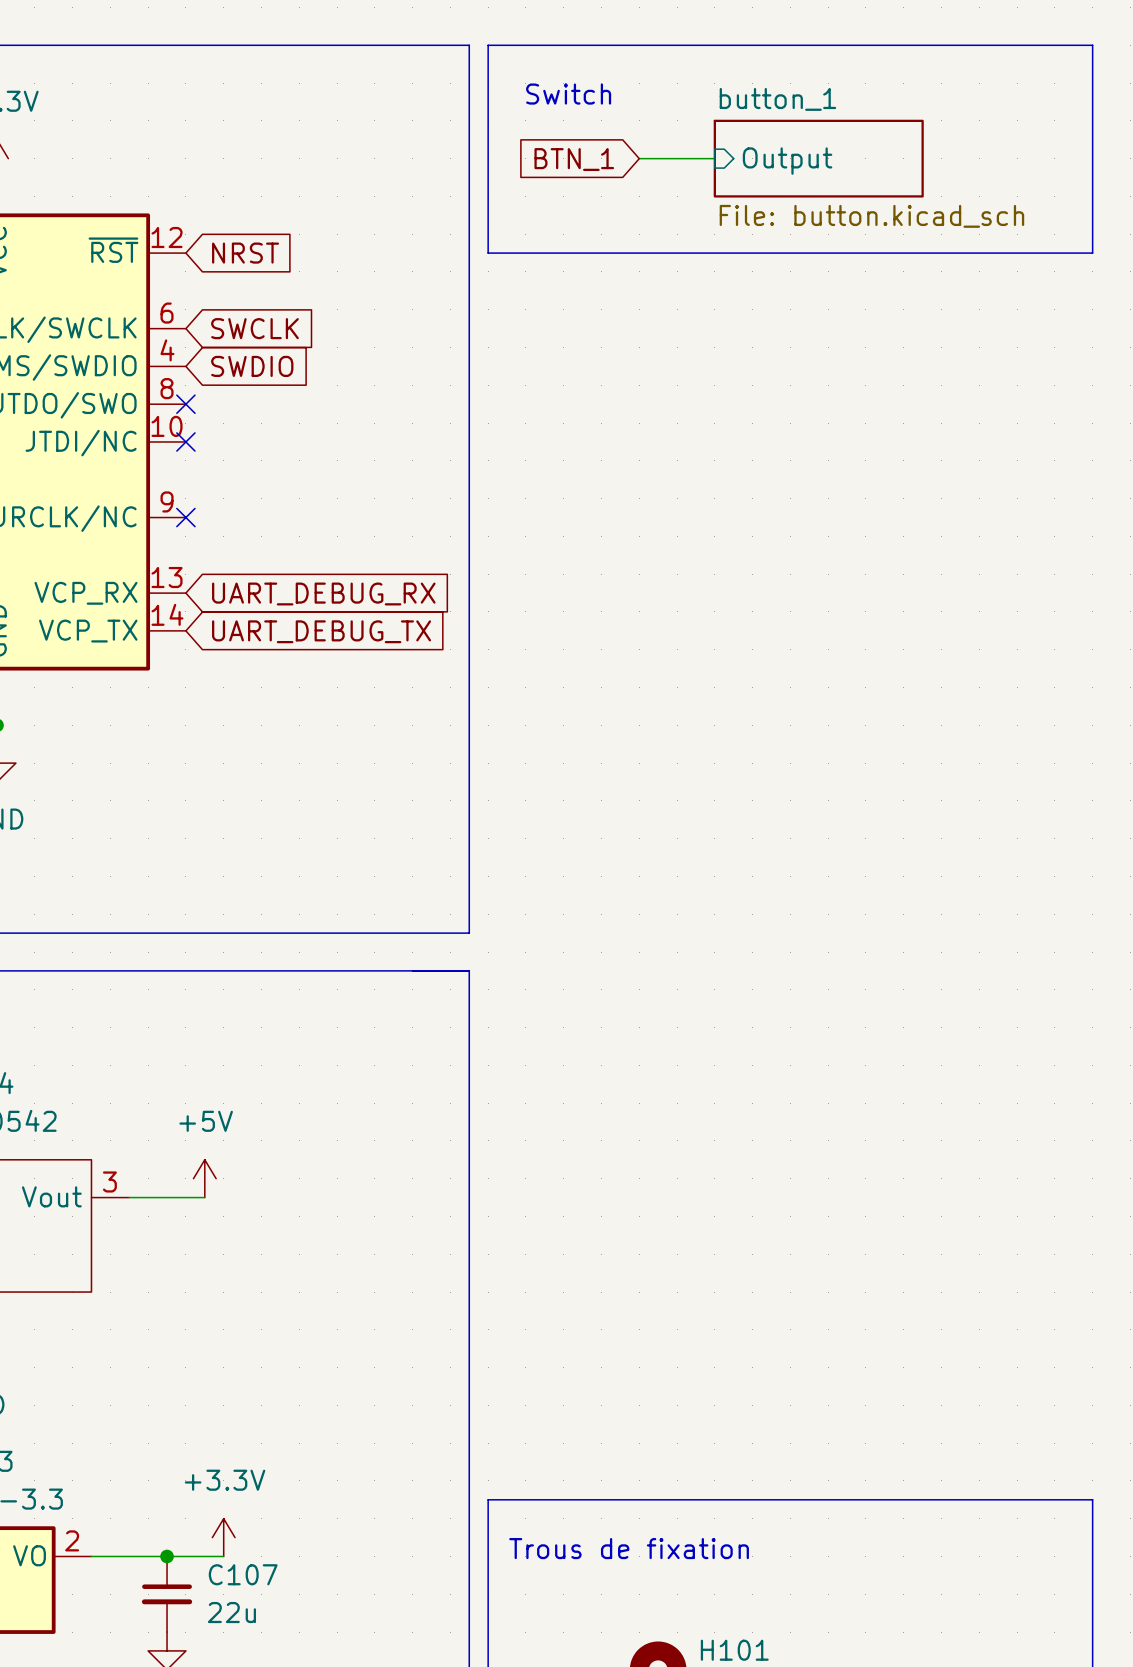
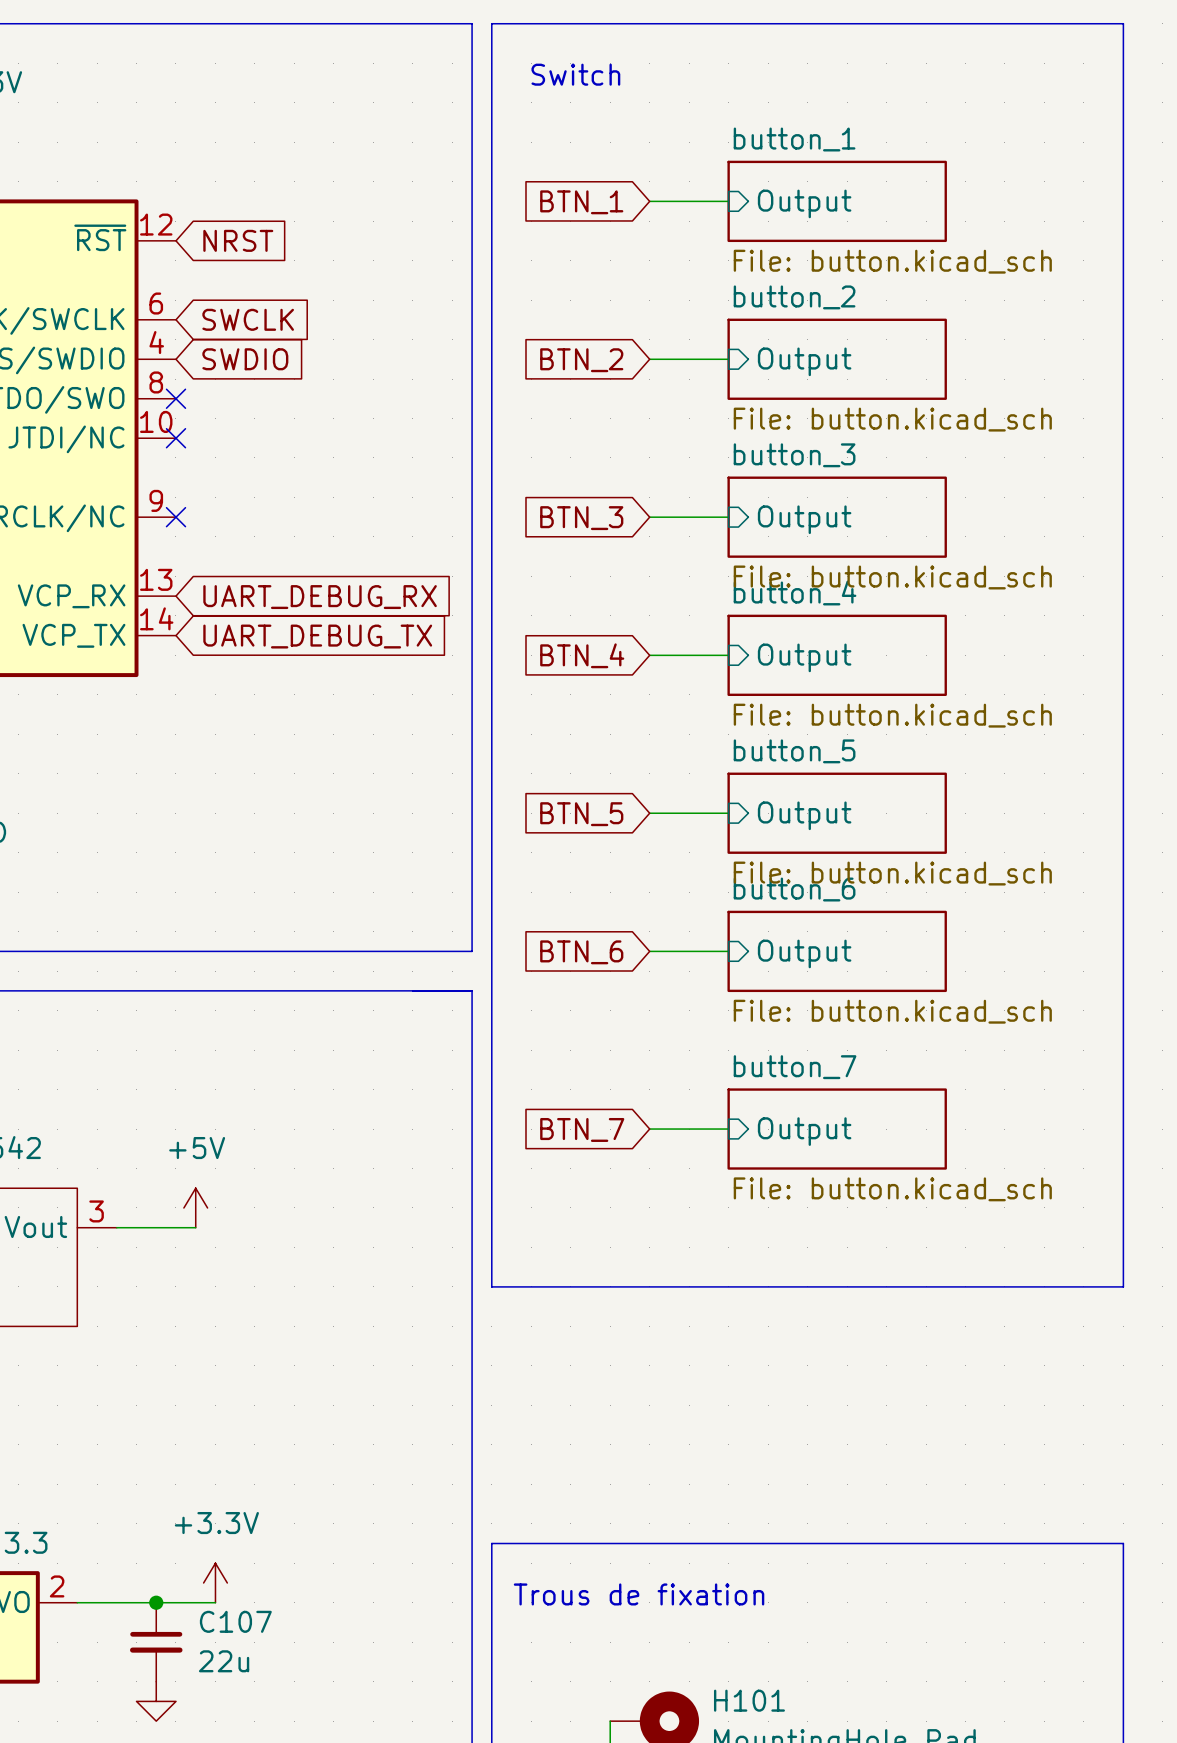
wire: (639, 158) (714, 158) -> (649, 201) (728, 201)
sheet button_1 position: (818, 158) -> (837, 201)
global label position: BTN_1 (574, 159) -> BTN_1 (581, 202)
sheet pin position: Output (787, 161) -> Output (804, 203)
line: (488, 253) (1092, 253) -> (491, 240) (491, 1286) (1123, 1286) (1123, 240)
wire: none -> (649, 359) (728, 359)
sheet button_2: none -> File: button.kicad_sch (837, 359)
global label: none -> BTN_2 (581, 360)
sheet pin: none -> Output (804, 361)
wire: none -> (649, 517) (728, 517)
sheet button_3: none -> File: button.kicad_sch (837, 517)
global label: none -> BTN_3 (581, 518)
sheet pin: none -> Output (804, 519)
wire: none -> (649, 655) (728, 655)
sheet button_4: none -> File: button.kicad_sch (837, 655)
global label: none -> BTN_4 (582, 655)
sheet pin: none -> Output (804, 657)
wire: none -> (649, 813) (728, 813)
sheet button_5: none -> File: button.kicad_sch (837, 813)
global label: none -> BTN_5 (581, 814)
sheet pin: none -> Output (804, 815)
wire: none -> (649, 951) (728, 951)
sheet button_6: none -> File: button.kicad_sch (837, 951)
global label: none -> BTN_6 (581, 952)
sheet pin: none -> Output (804, 953)
wire: none -> (649, 1129) (728, 1129)
sheet button_7: none -> File: button.kicad_sch (837, 1129)
global label: none -> BTN_7 (582, 1129)
sheet pin: none -> Output (804, 1131)

